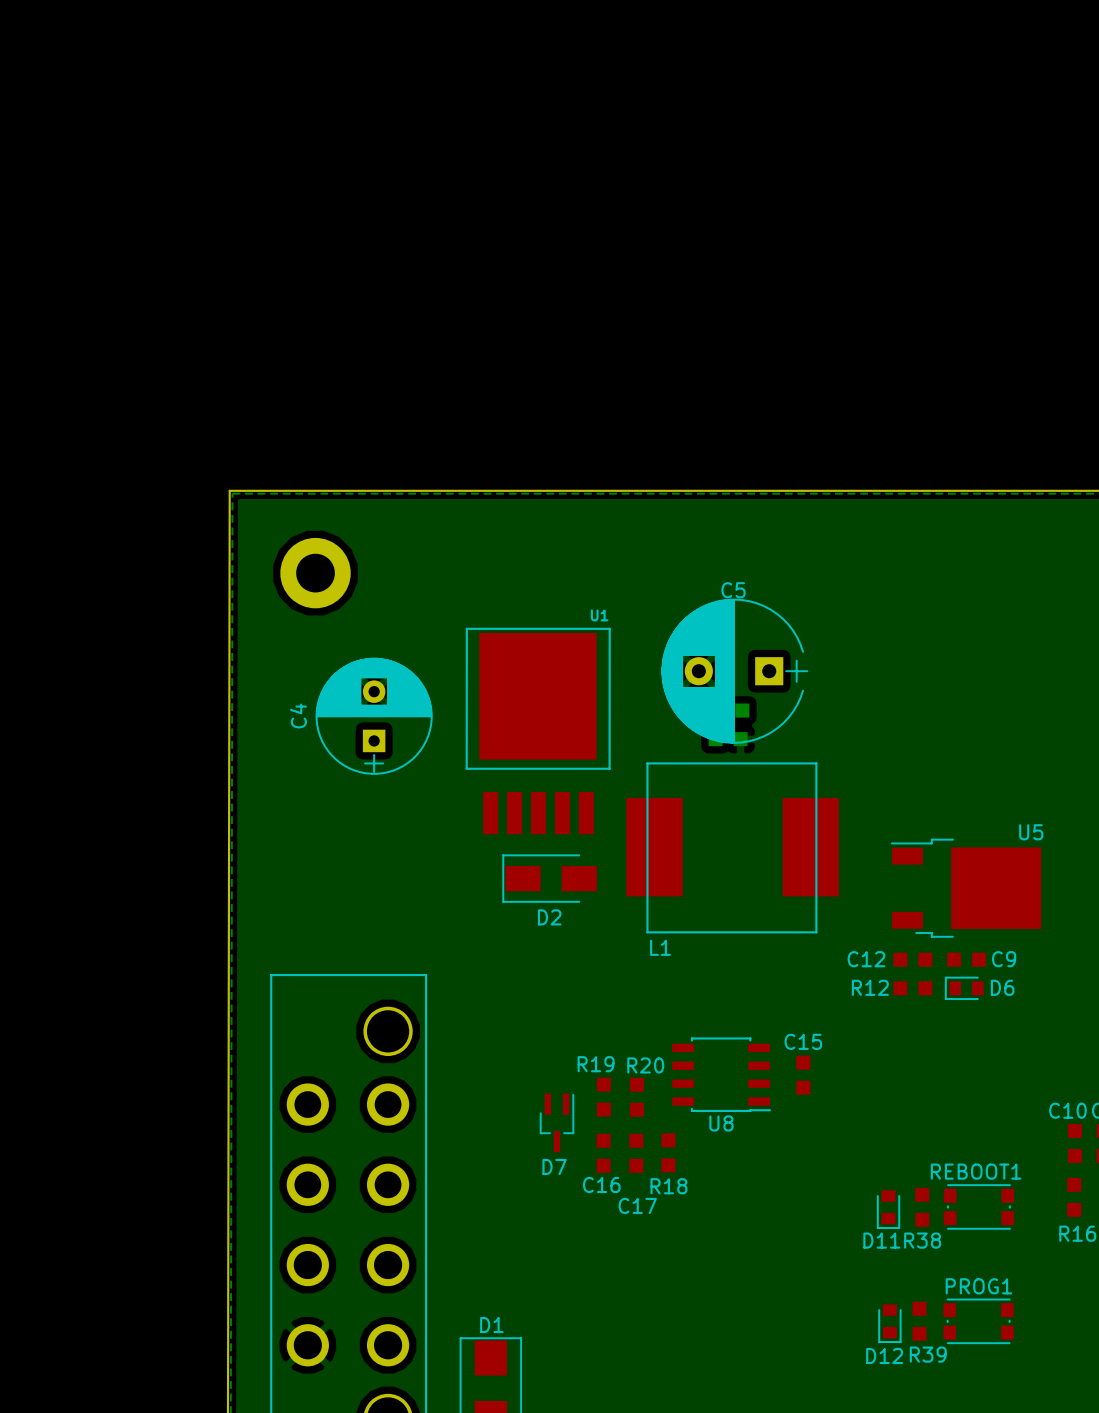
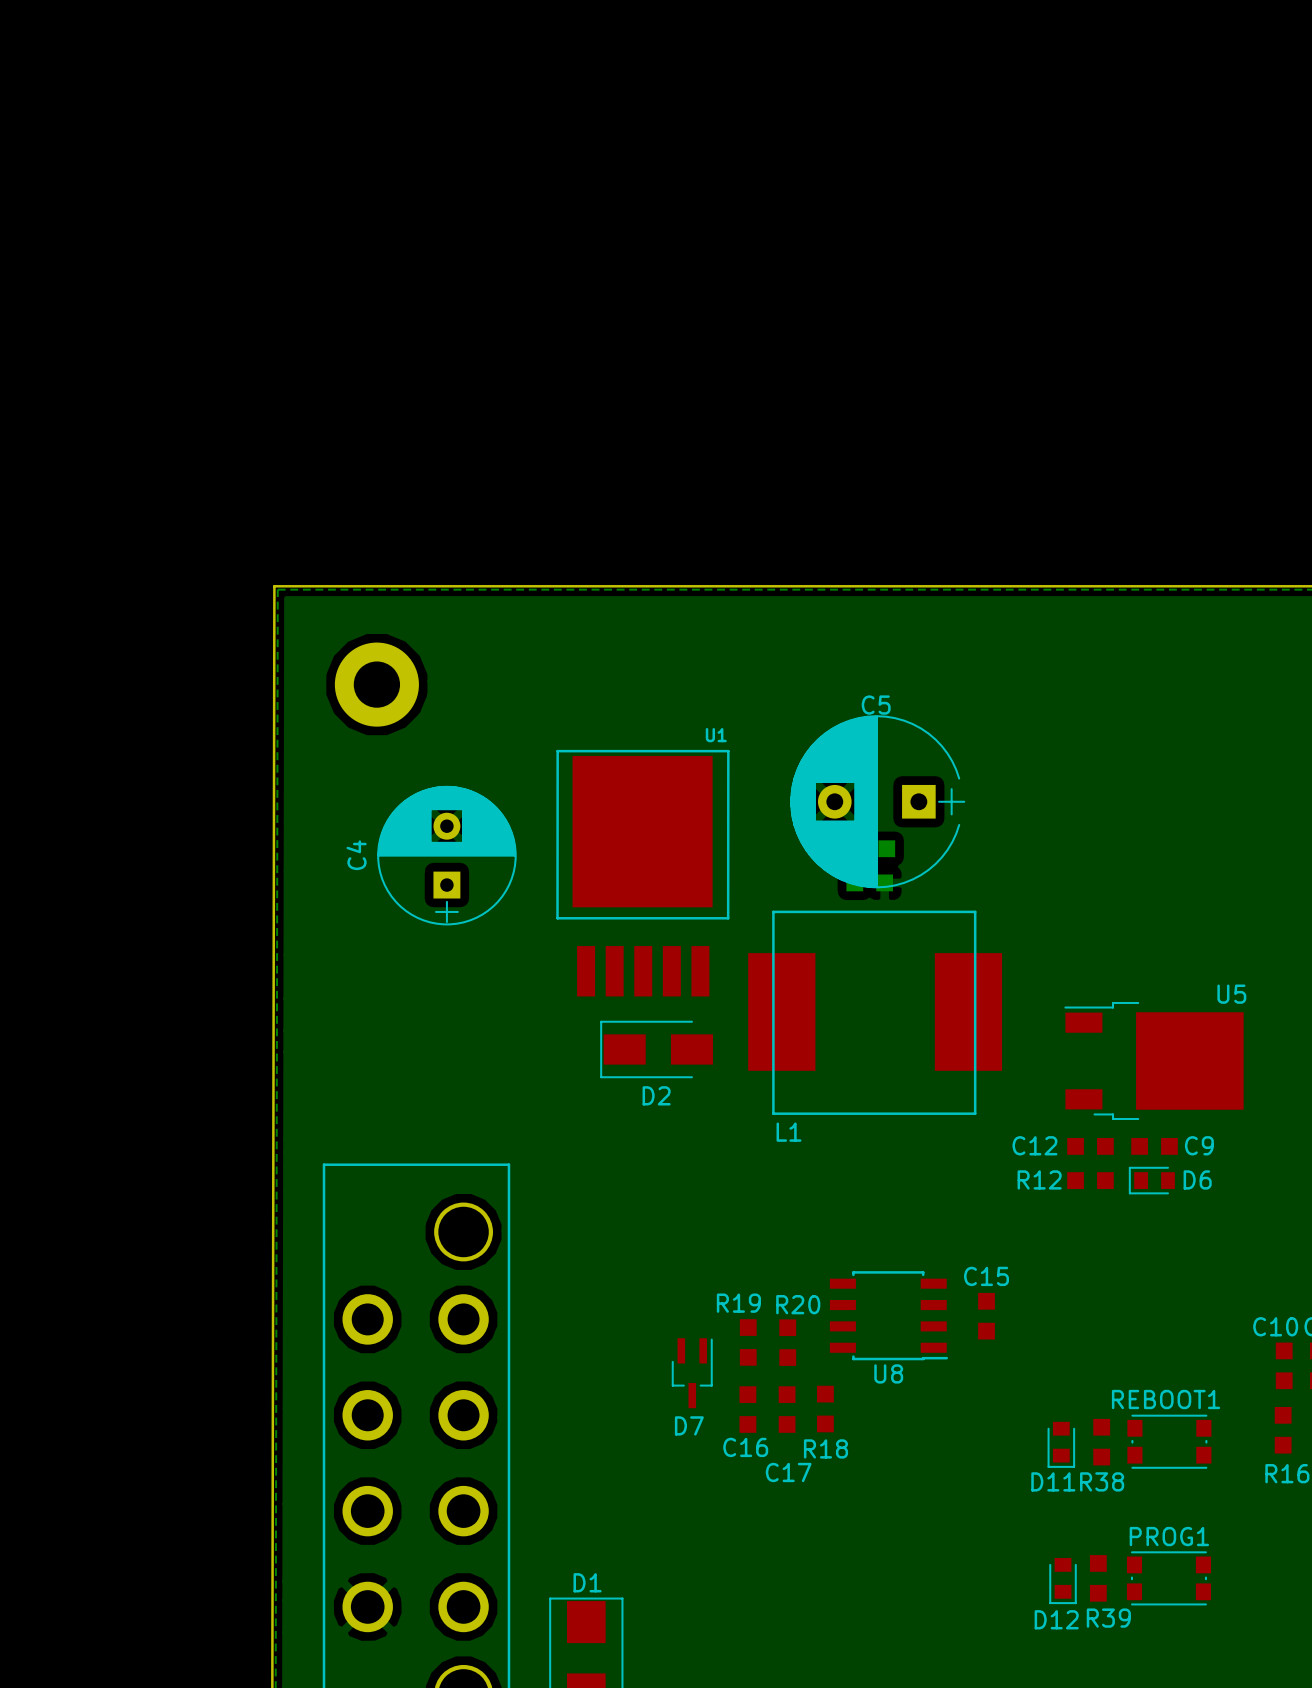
U8 position: (721, 1074) -> (888, 1315)
C15 position: (803, 1075) -> (986, 1316)
R19 position: (603, 1097) -> (748, 1342)
R20 position: (636, 1097) -> (787, 1342)
D7 position: (557, 1122) -> (692, 1373)
R18 position: (668, 1152) -> (825, 1409)
C16 position: (603, 1153) -> (747, 1409)
C17 position: (636, 1153) -> (787, 1409)

